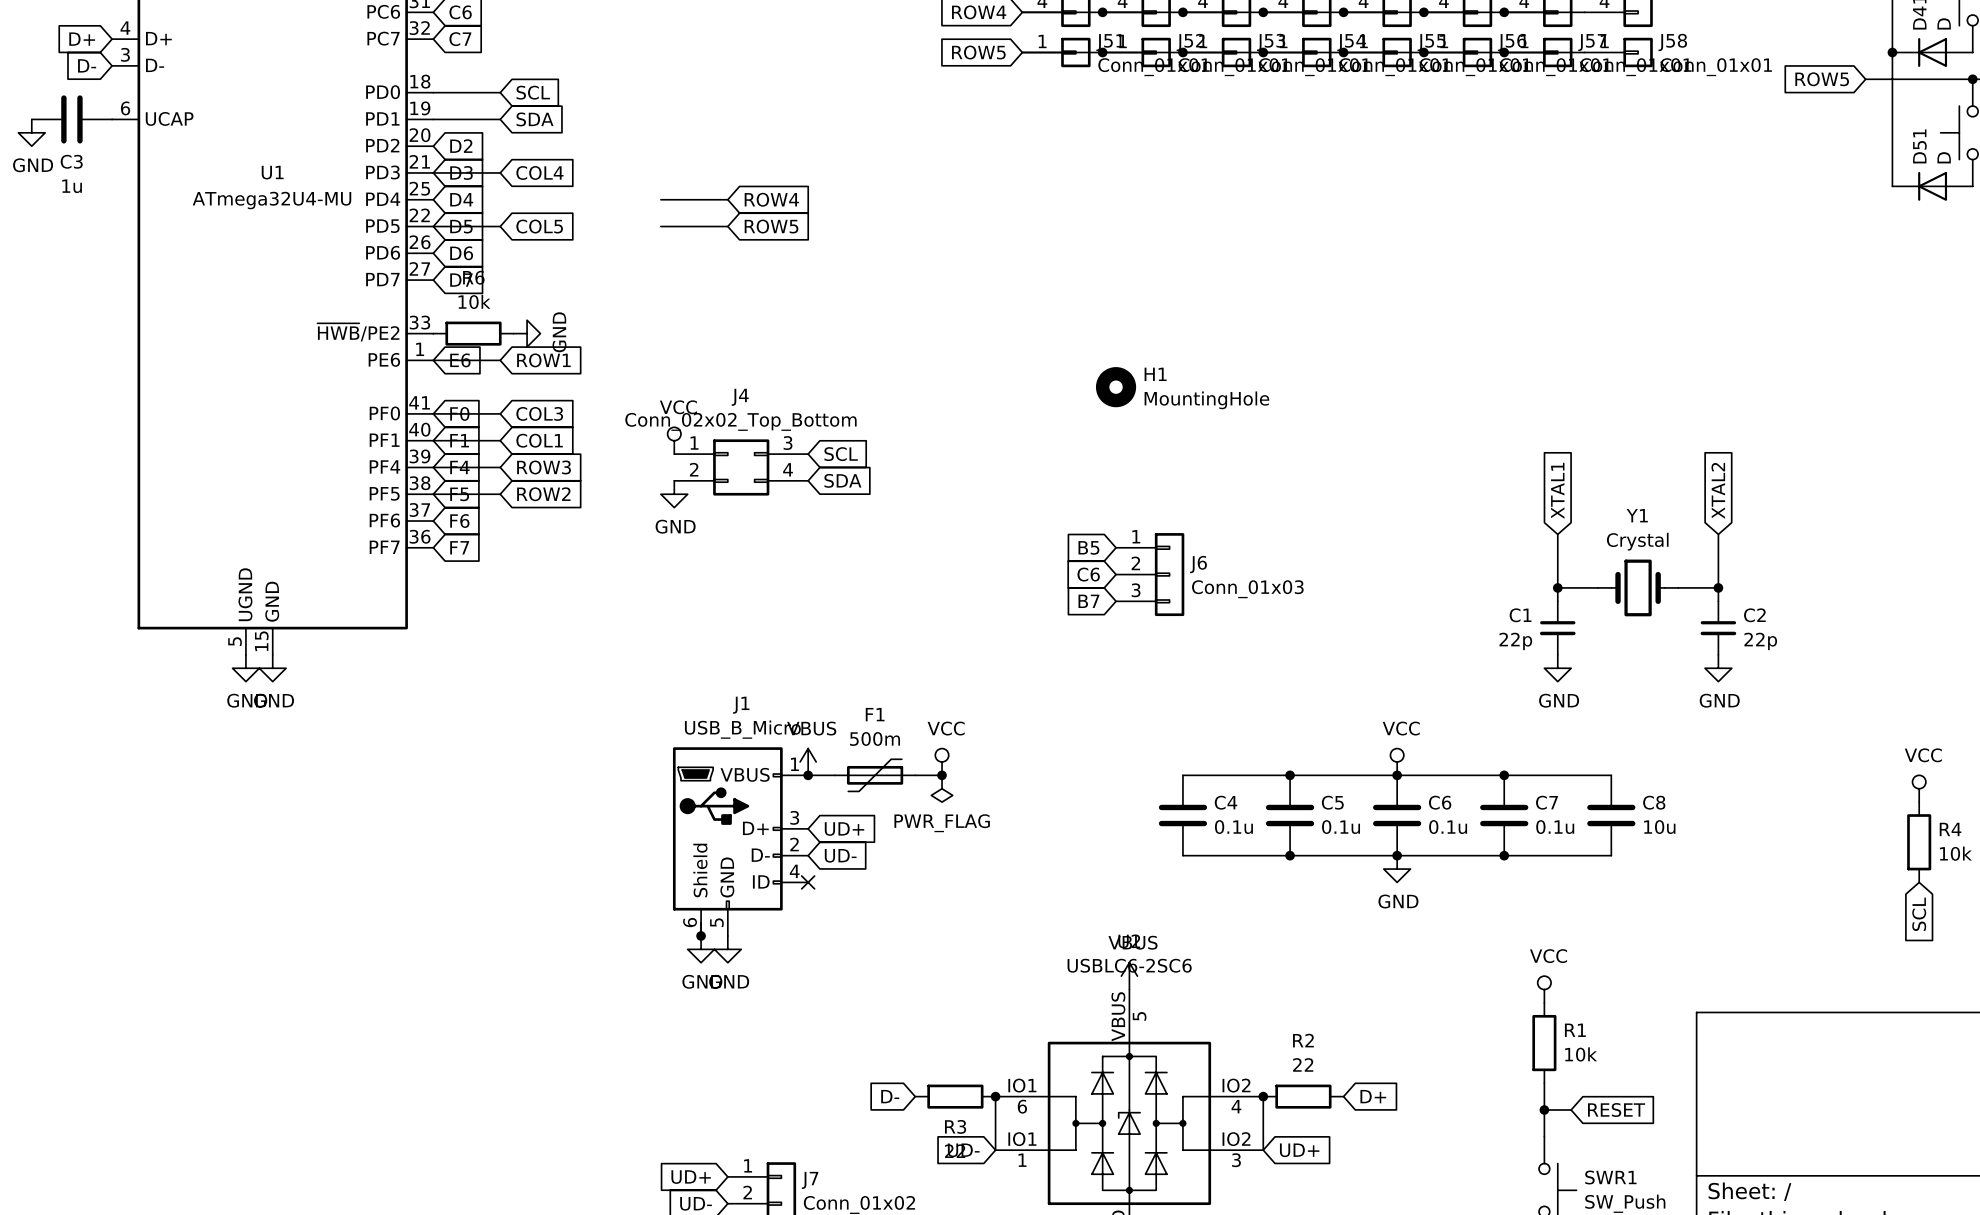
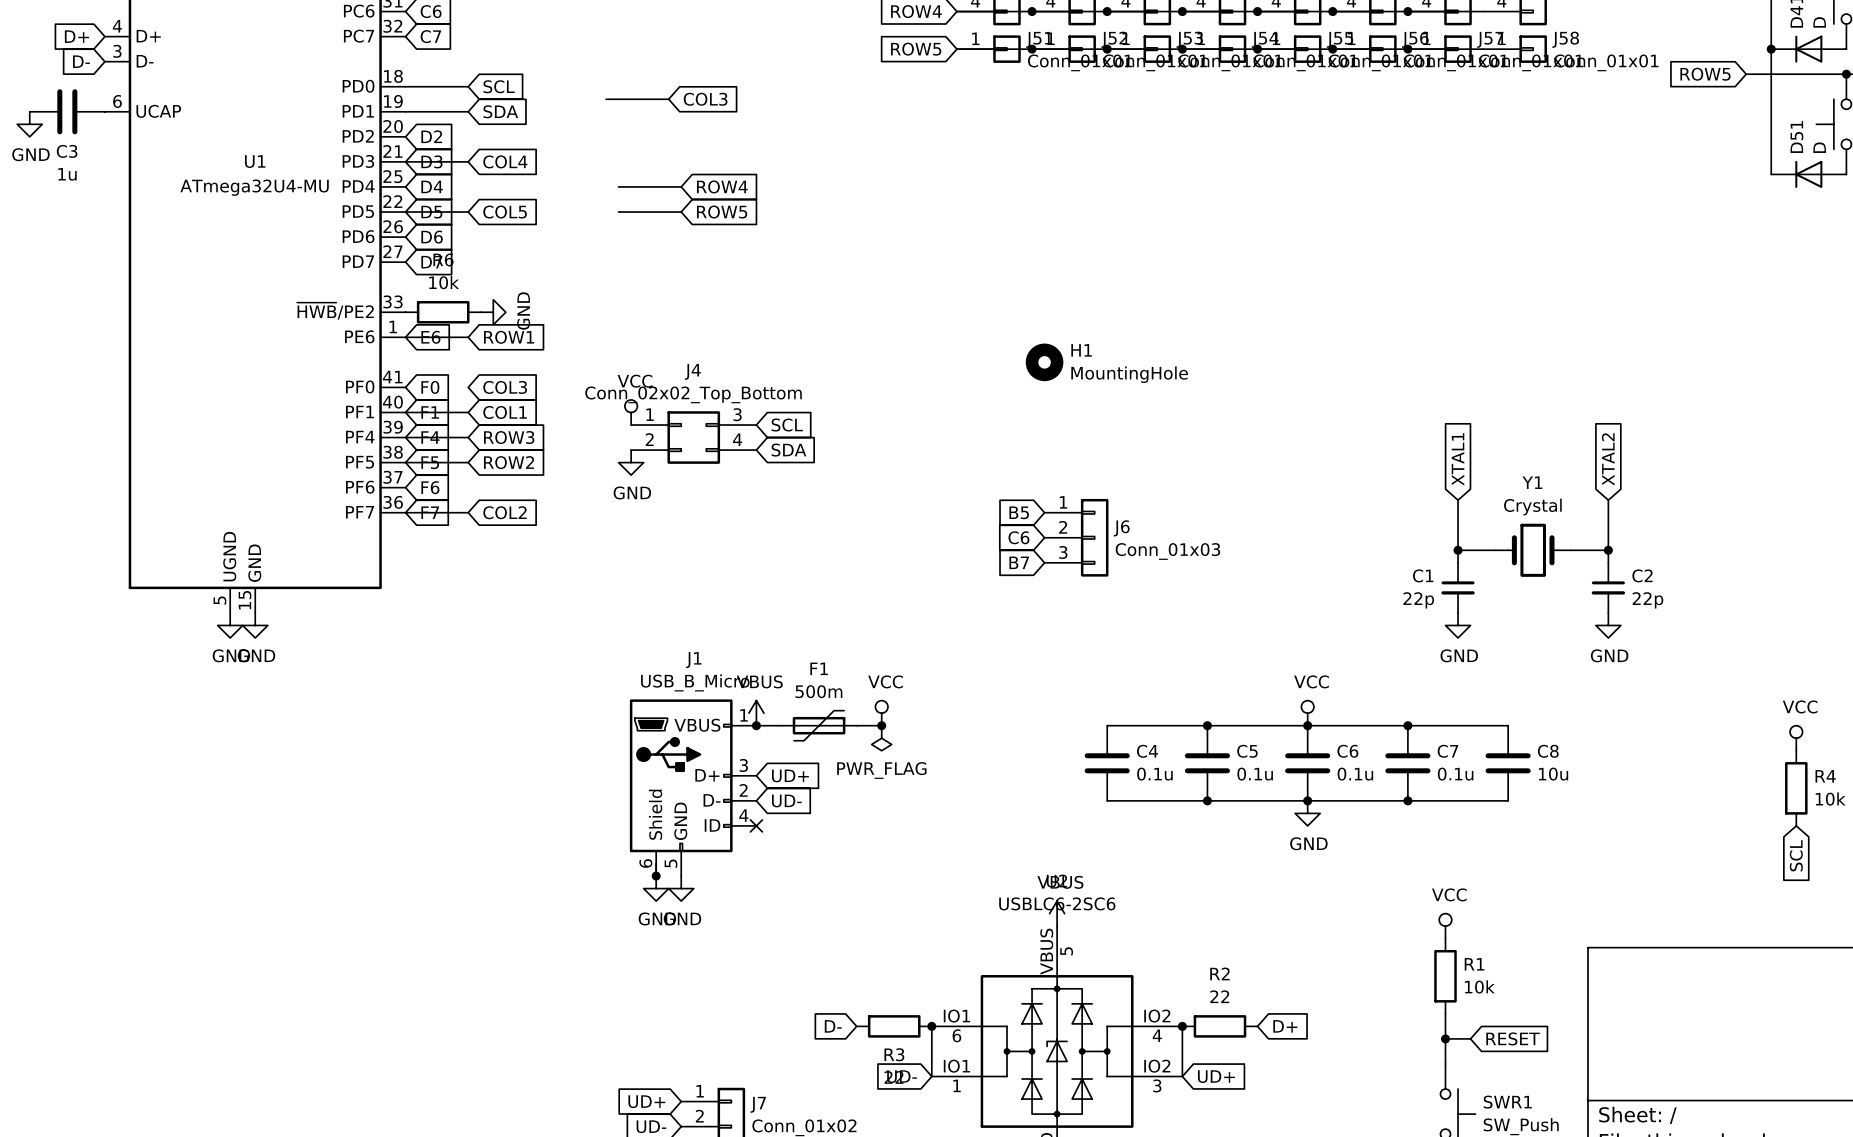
wire: none -> (606, 99) (668, 99)
global label: none -> COL3 (705, 99)
wire: (433, 413) (500, 413) -> (405, 512) (468, 512)
global label: none -> COL2 (504, 512)

